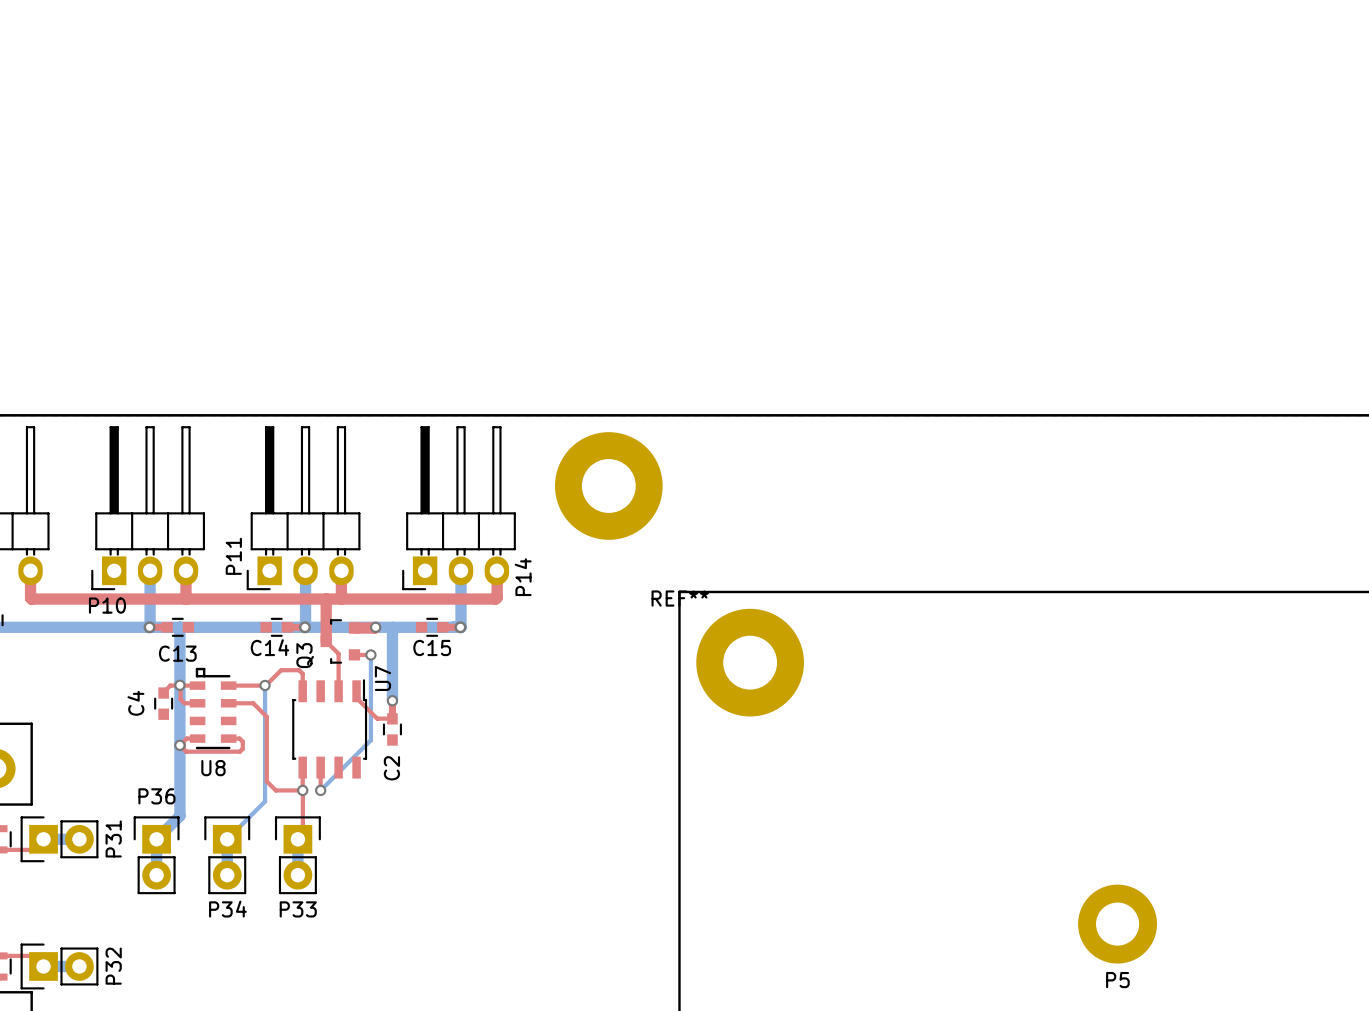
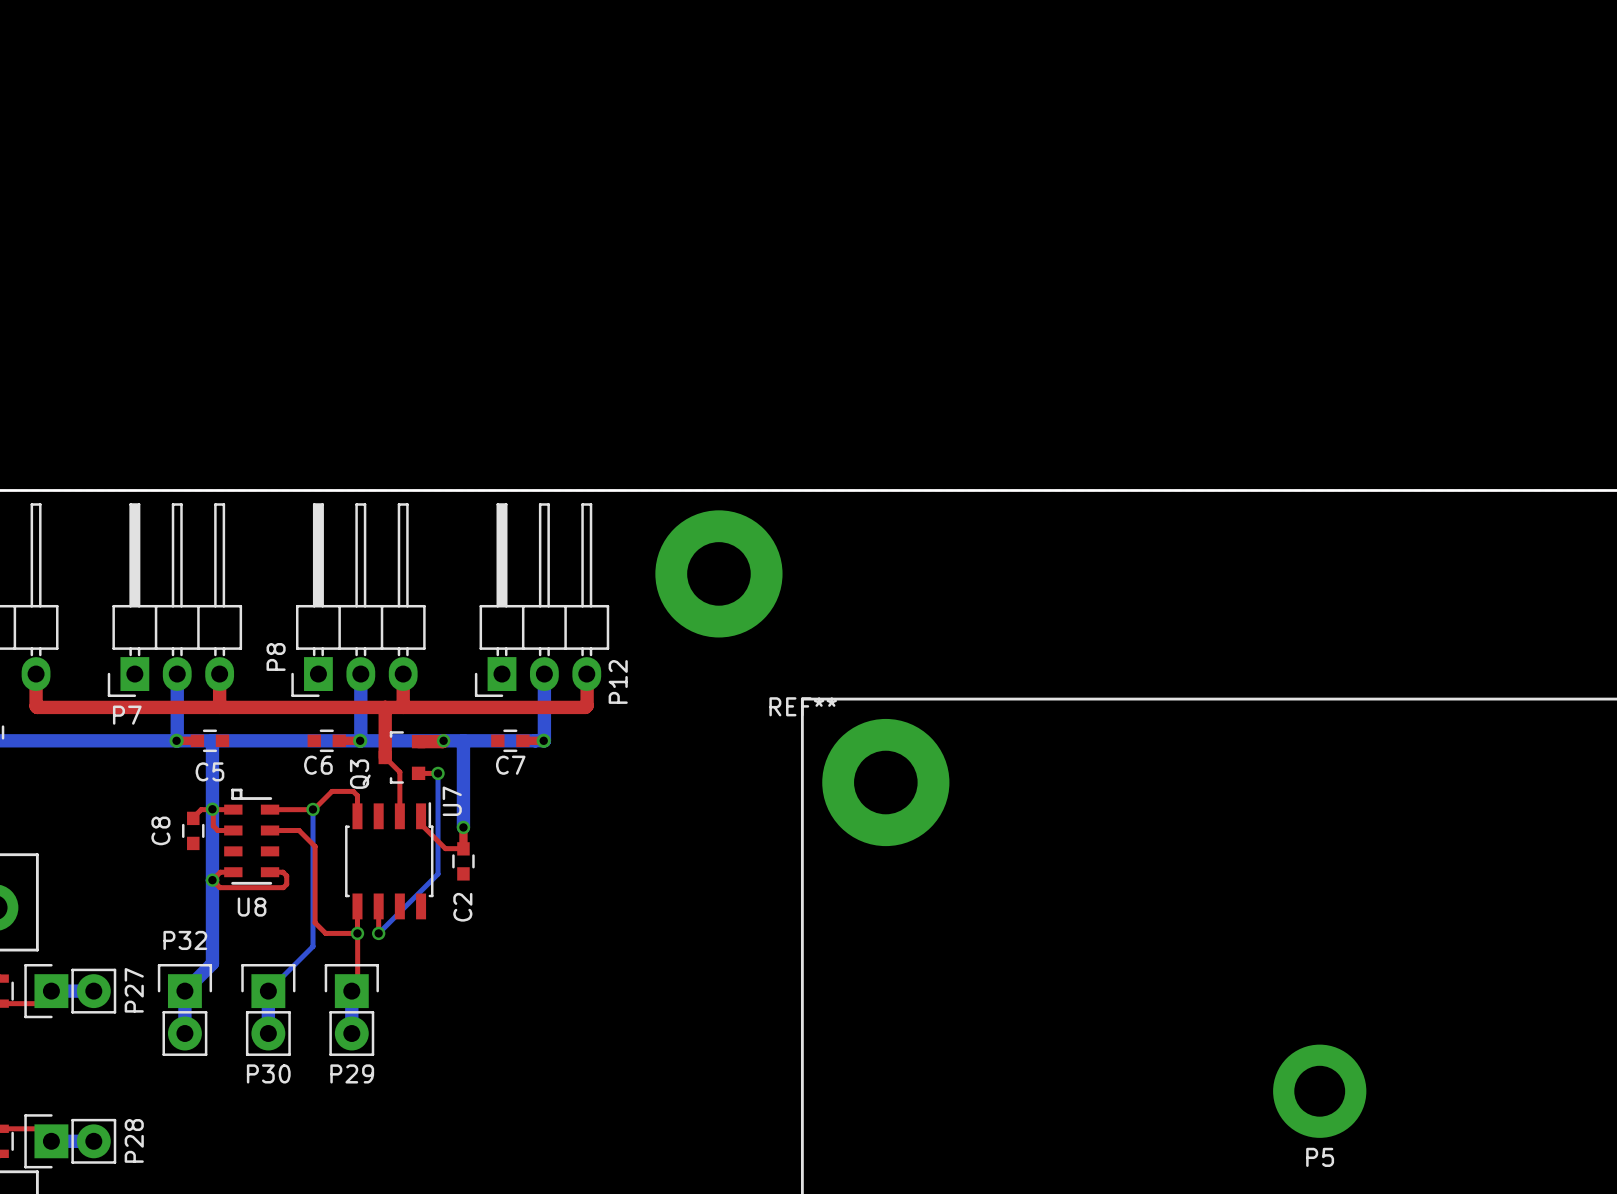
P11 name: P11 (233, 556) -> P8 (276, 656)
P14 name: P14 (523, 577) -> P12 (618, 681)
P10 name: P10 (107, 605) -> P7 (127, 715)
C14 name: C14 (269, 647) -> C6 (318, 765)
C15 name: C15 (432, 647) -> C7 (510, 765)
C13 name: C13 (177, 653) -> C5 (209, 771)
C4 name: C4 (135, 703) -> C8 (160, 830)
P36 name: P36 (156, 796) -> P32 (185, 940)
P31 name: P31 (113, 838) -> P27 (134, 990)
P34 name: P34 (227, 909) -> P30 (268, 1073)
P33 name: P33 (298, 909) -> P29 (352, 1073)
P32 name: P32 (113, 966) -> P28 (134, 1140)

